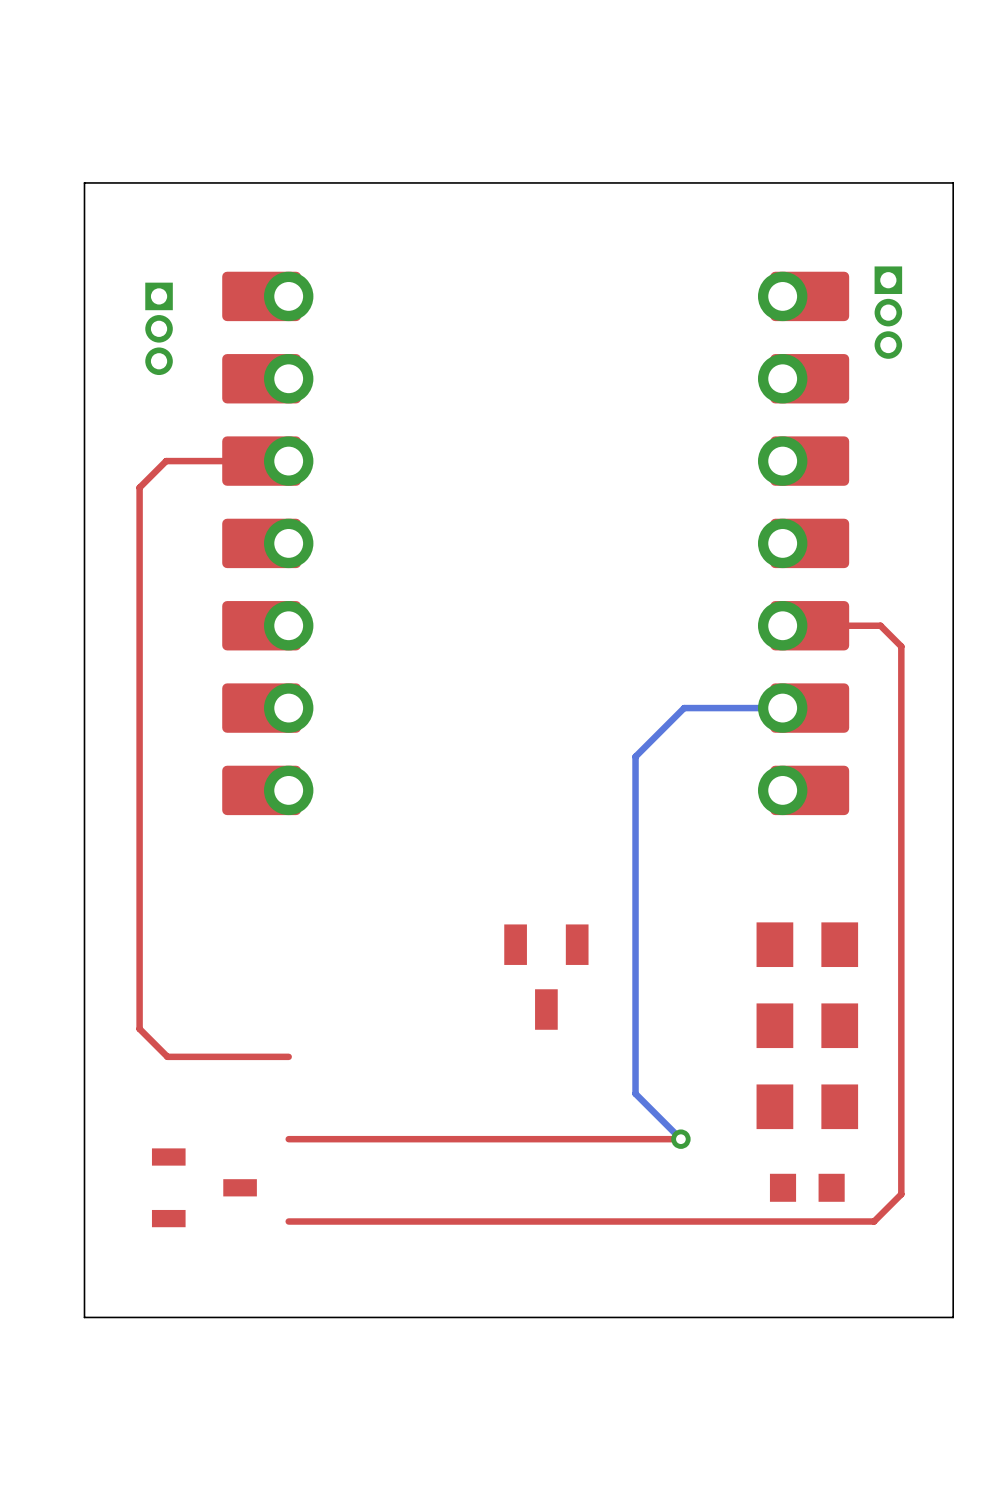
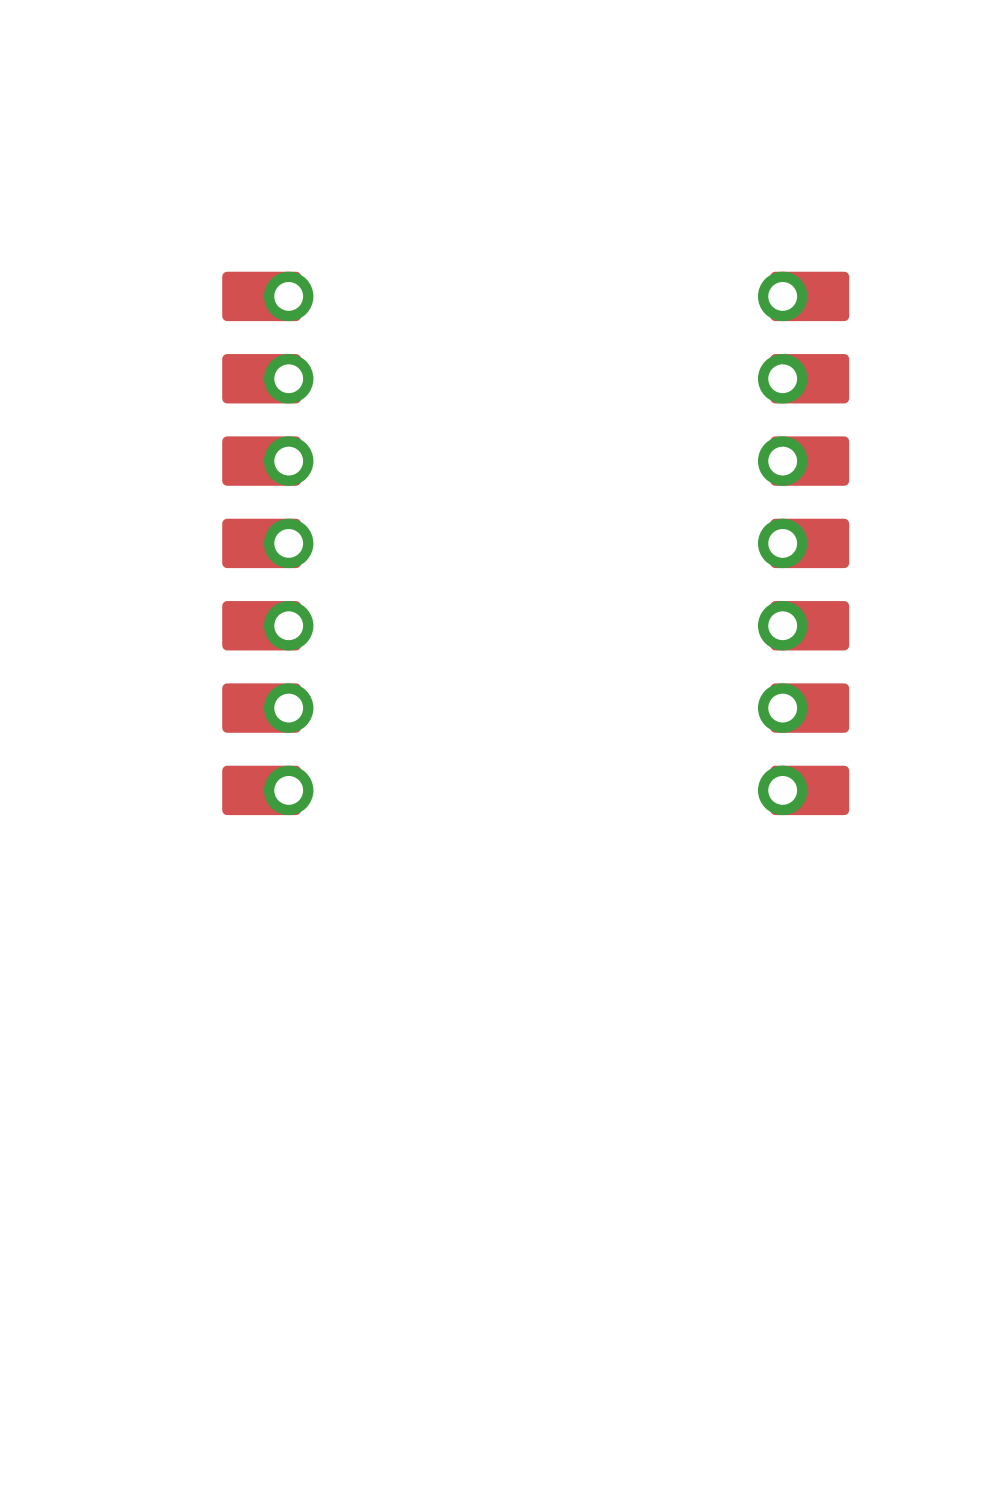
board edge: (953, 182) (84, 182) (84, 1317) (953, 1317) (953, 182) -> none
part: (888, 312) -> none
part: (159, 328) -> none
top track: (261, 461) (166, 461) (139, 487) (139, 1028) (167, 1056) (288, 1056) -> none
top track: (809, 625) (880, 625) (901, 646) (901, 1194) (874, 1221) (288, 1221) -> none
bottom track: (782, 708) (684, 708) (635, 756) (635, 1093) (680, 1139) -> none
part: (807, 944) -> none
part: (546, 977) -> none
part: (807, 1025) -> none
part: (807, 1106) -> none
top track: (680, 1139) (288, 1139) -> none
via: (680, 1139) -> none
part: (204, 1187) -> none
part: (807, 1187) -> none

